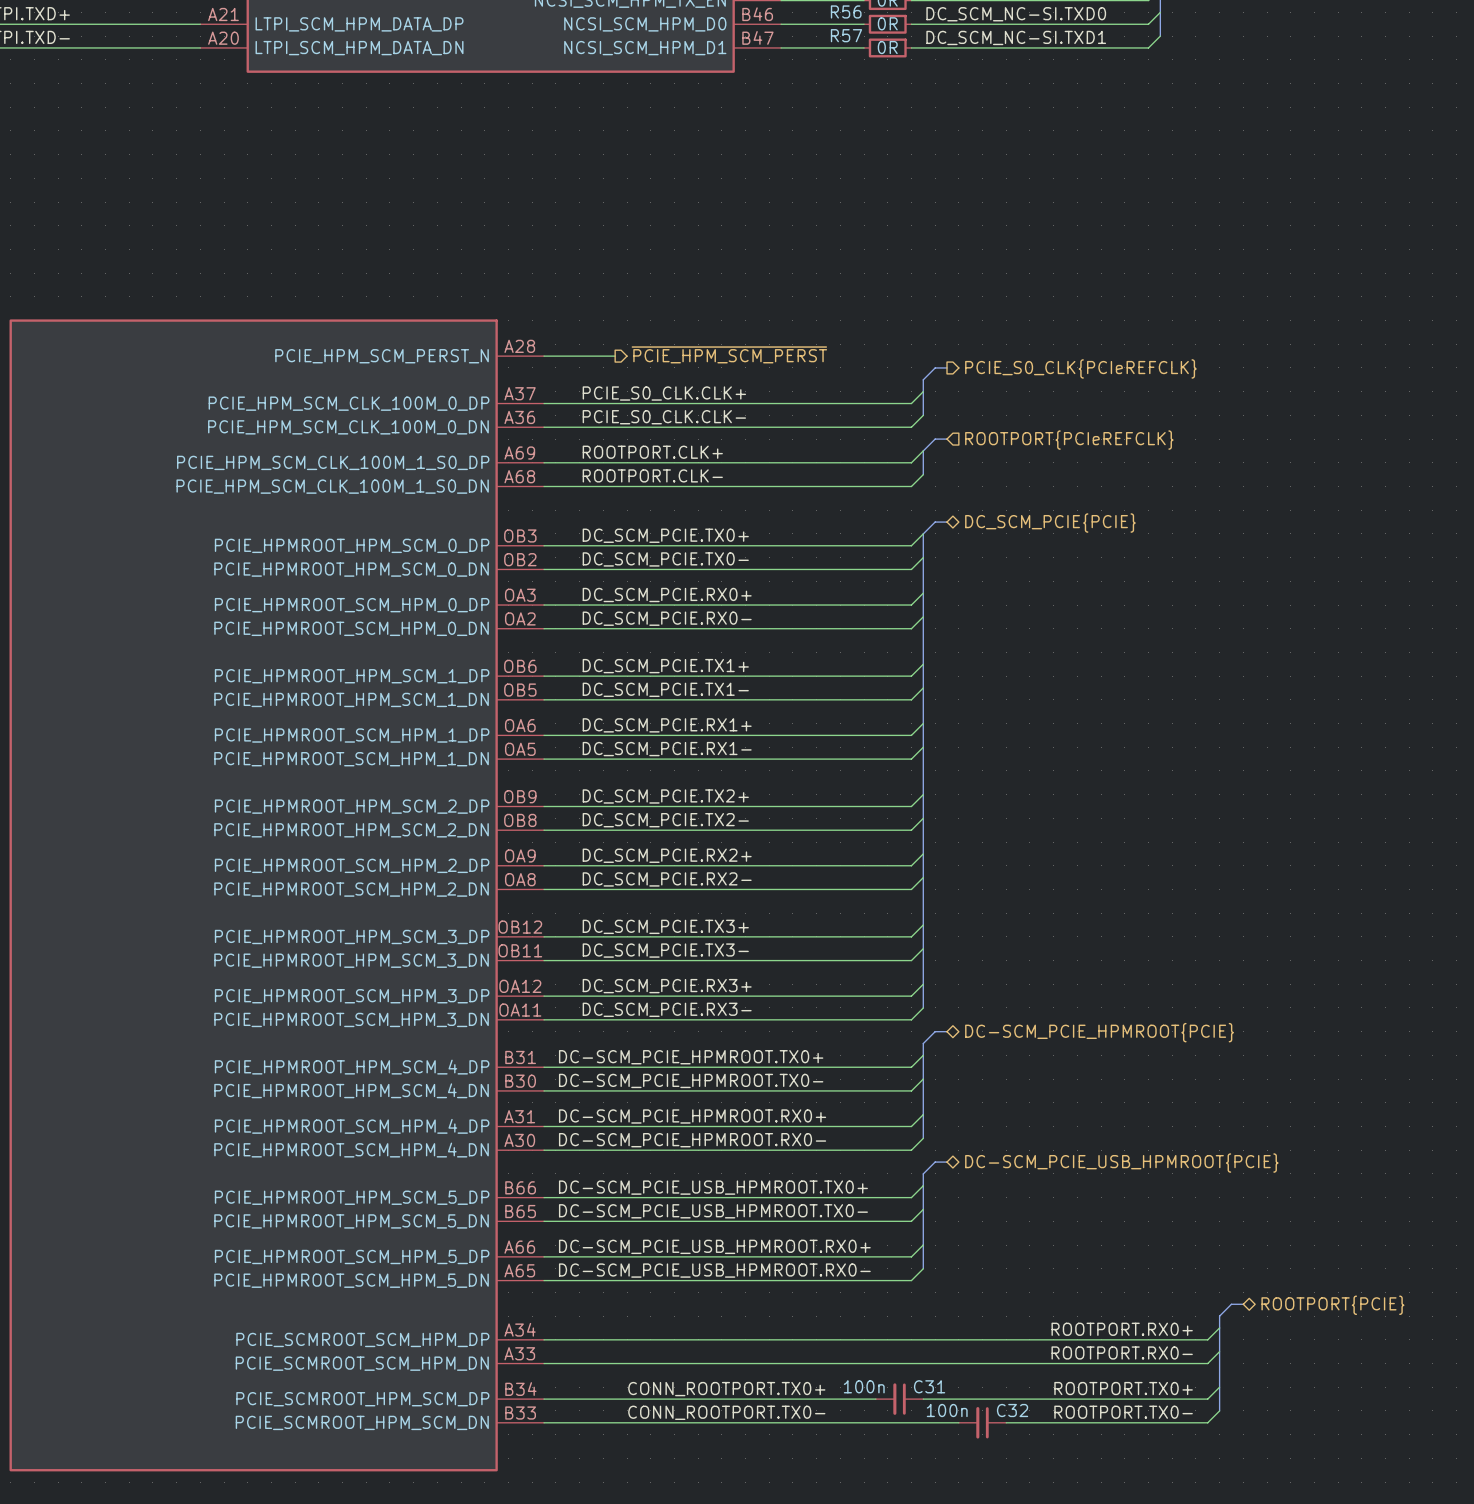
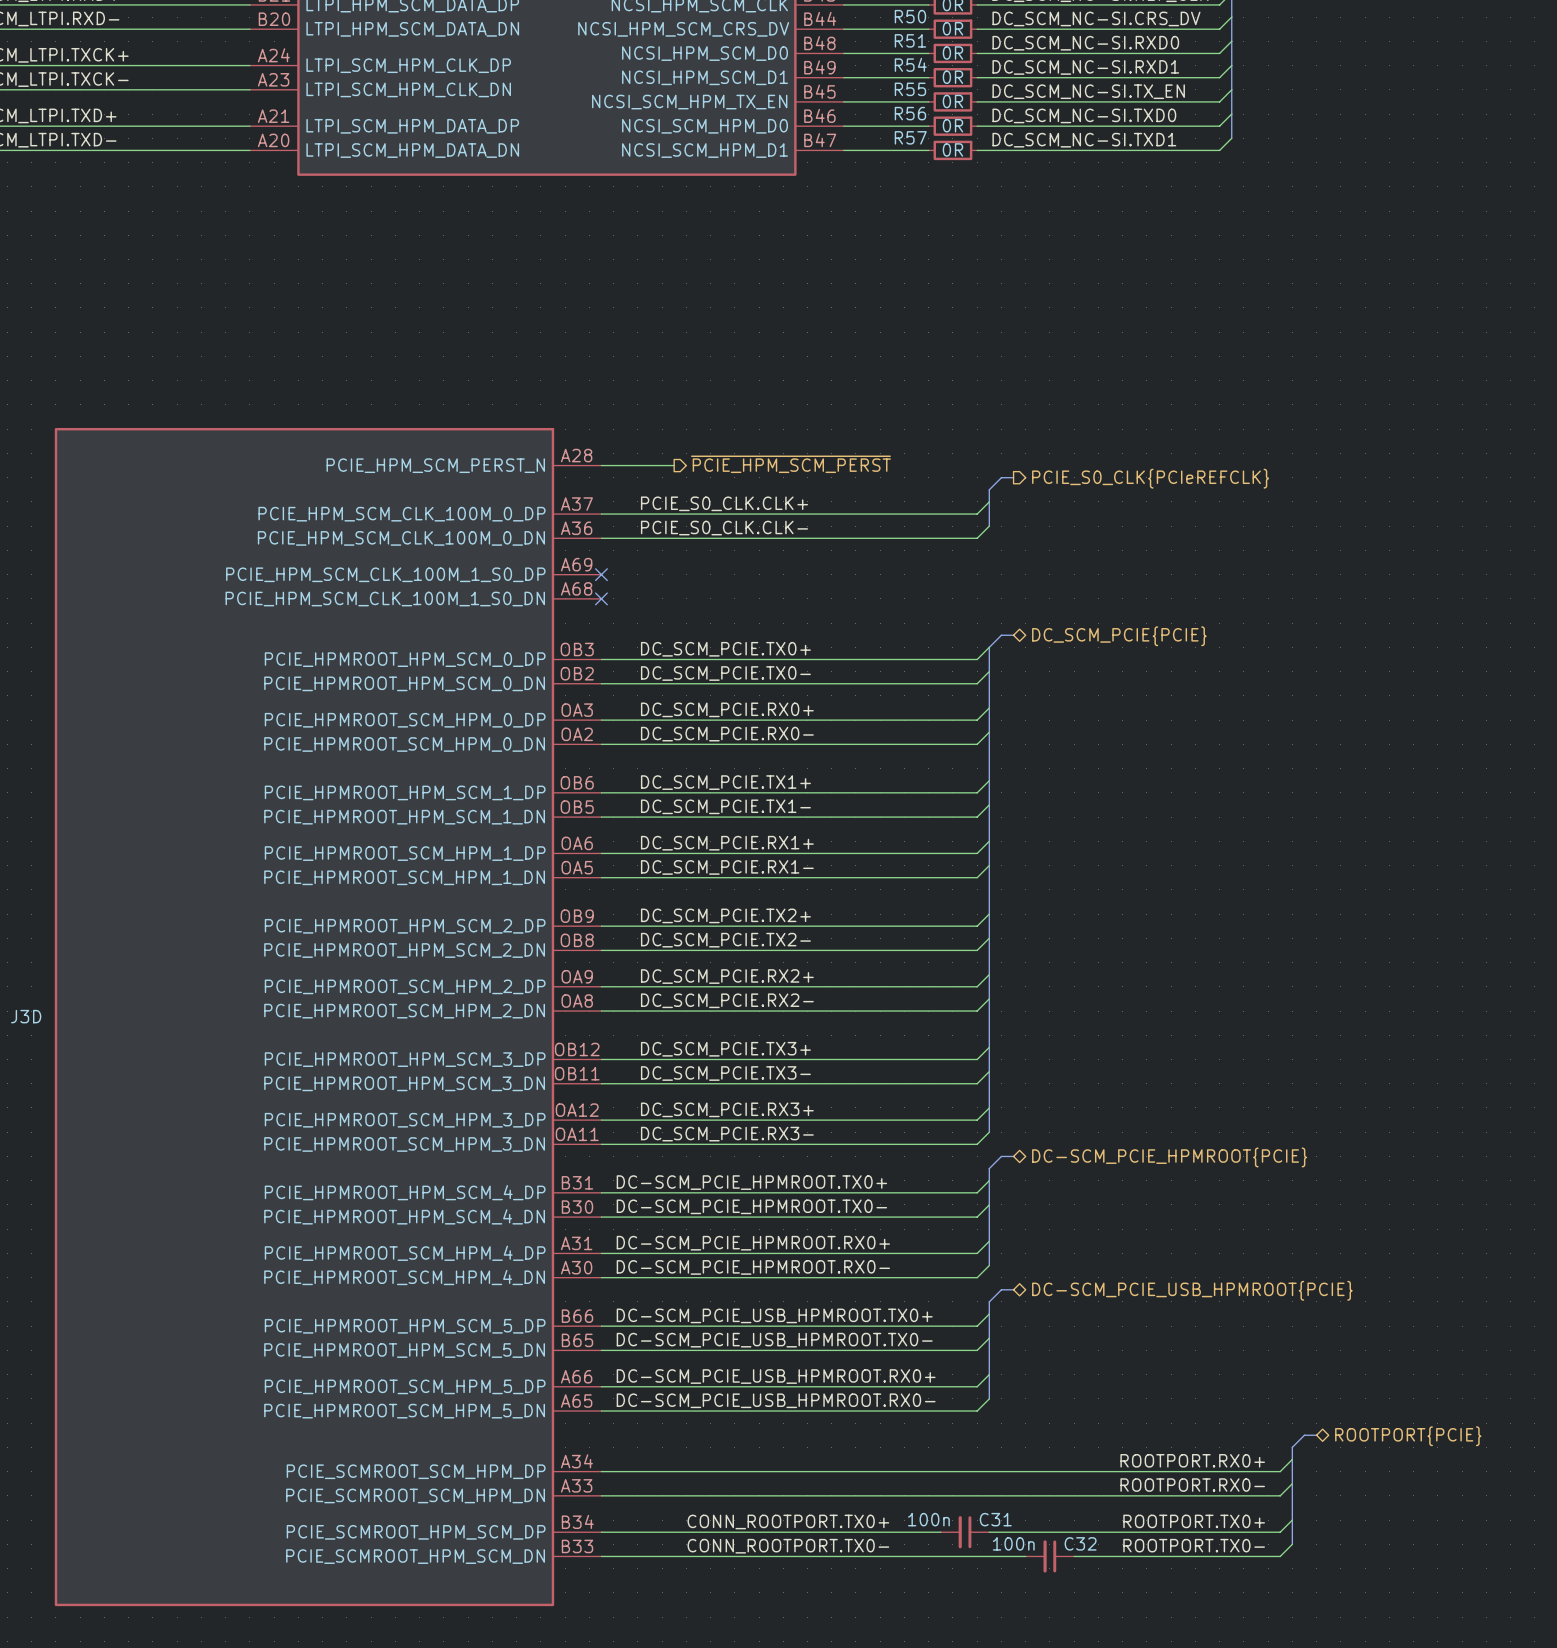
bus: (947, 439) (935, 439) (923, 450) (923, 474) -> none
hierarchical label: ROOTPORT{PCIeREFCLK} (1069, 440) -> none
wire: (923, 450) (911, 462) (544, 462) -> none
label: ROOTPORT.CLK+ (652, 452) -> none
no-connect mark: none -> (601, 574)
wire: (923, 474) (911, 486) (544, 486) -> none
label: ROOTPORT.CLK- (652, 475) -> none
no-connect mark: none -> (601, 598)

